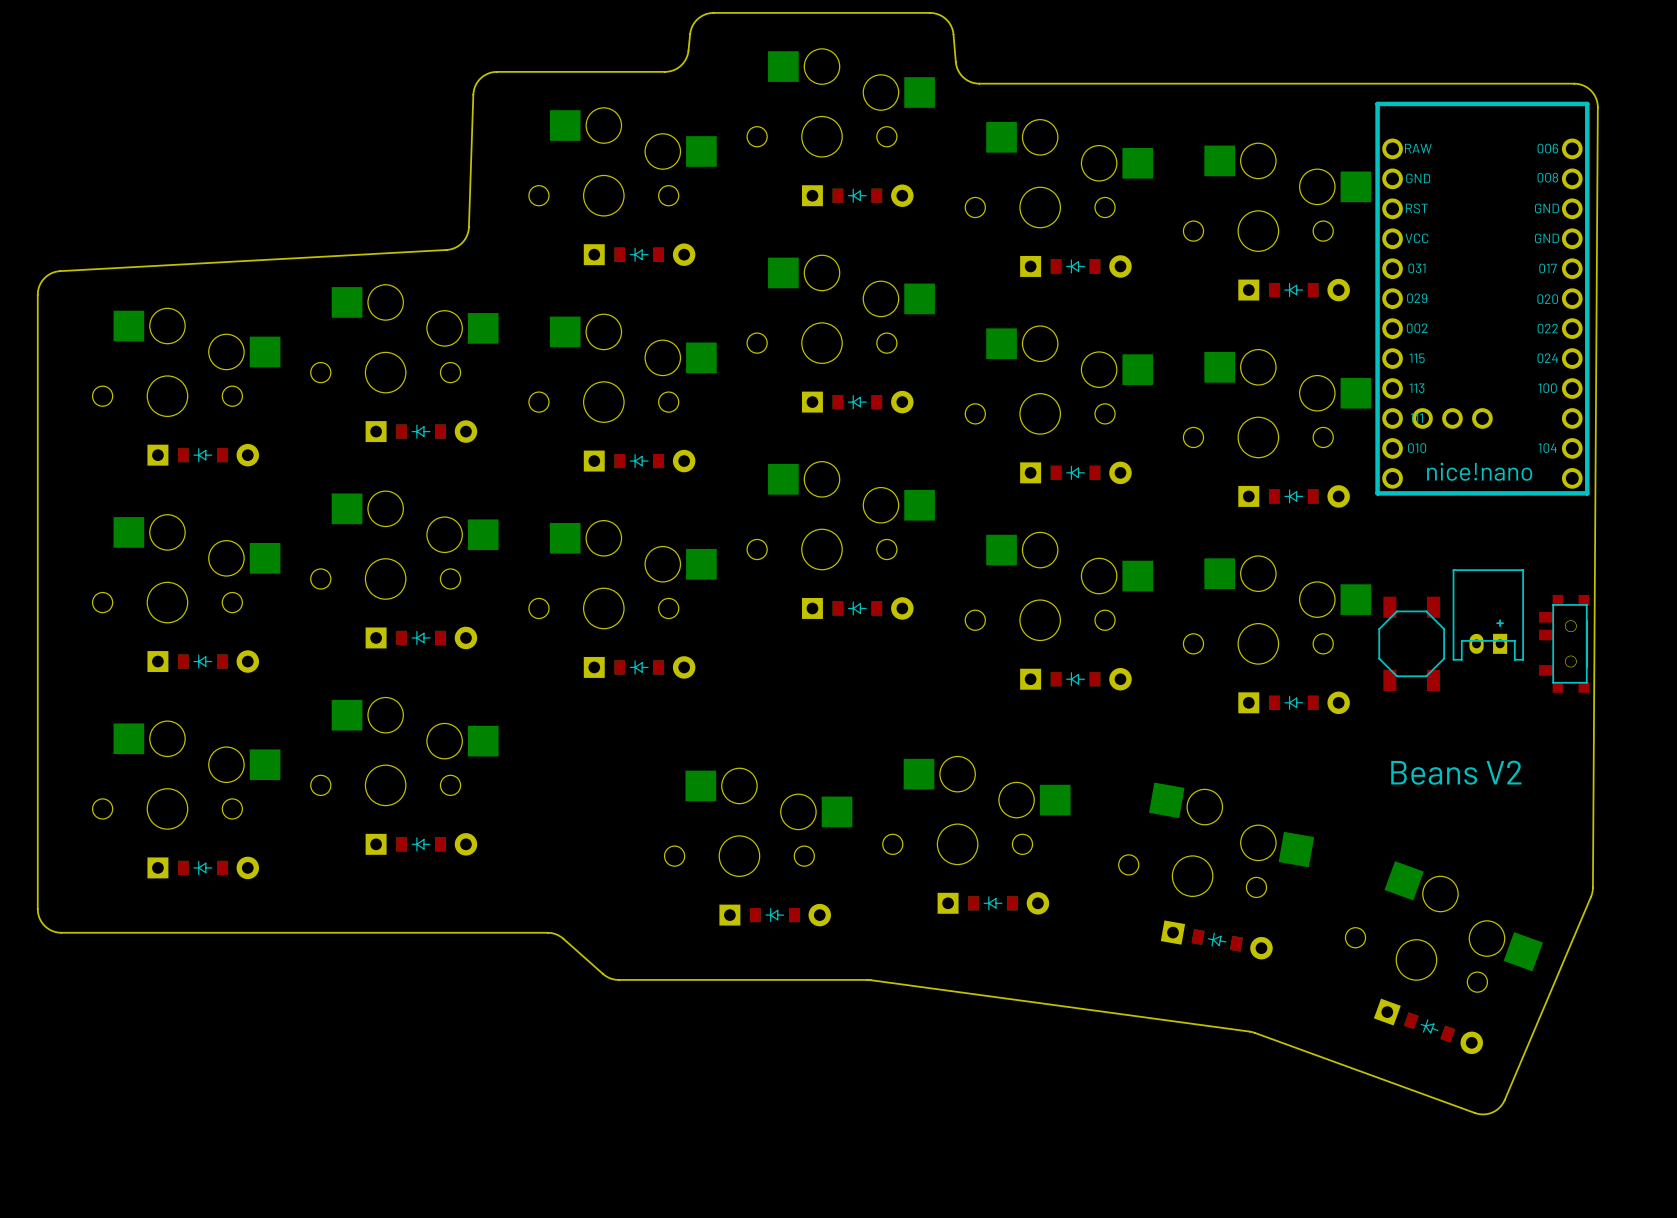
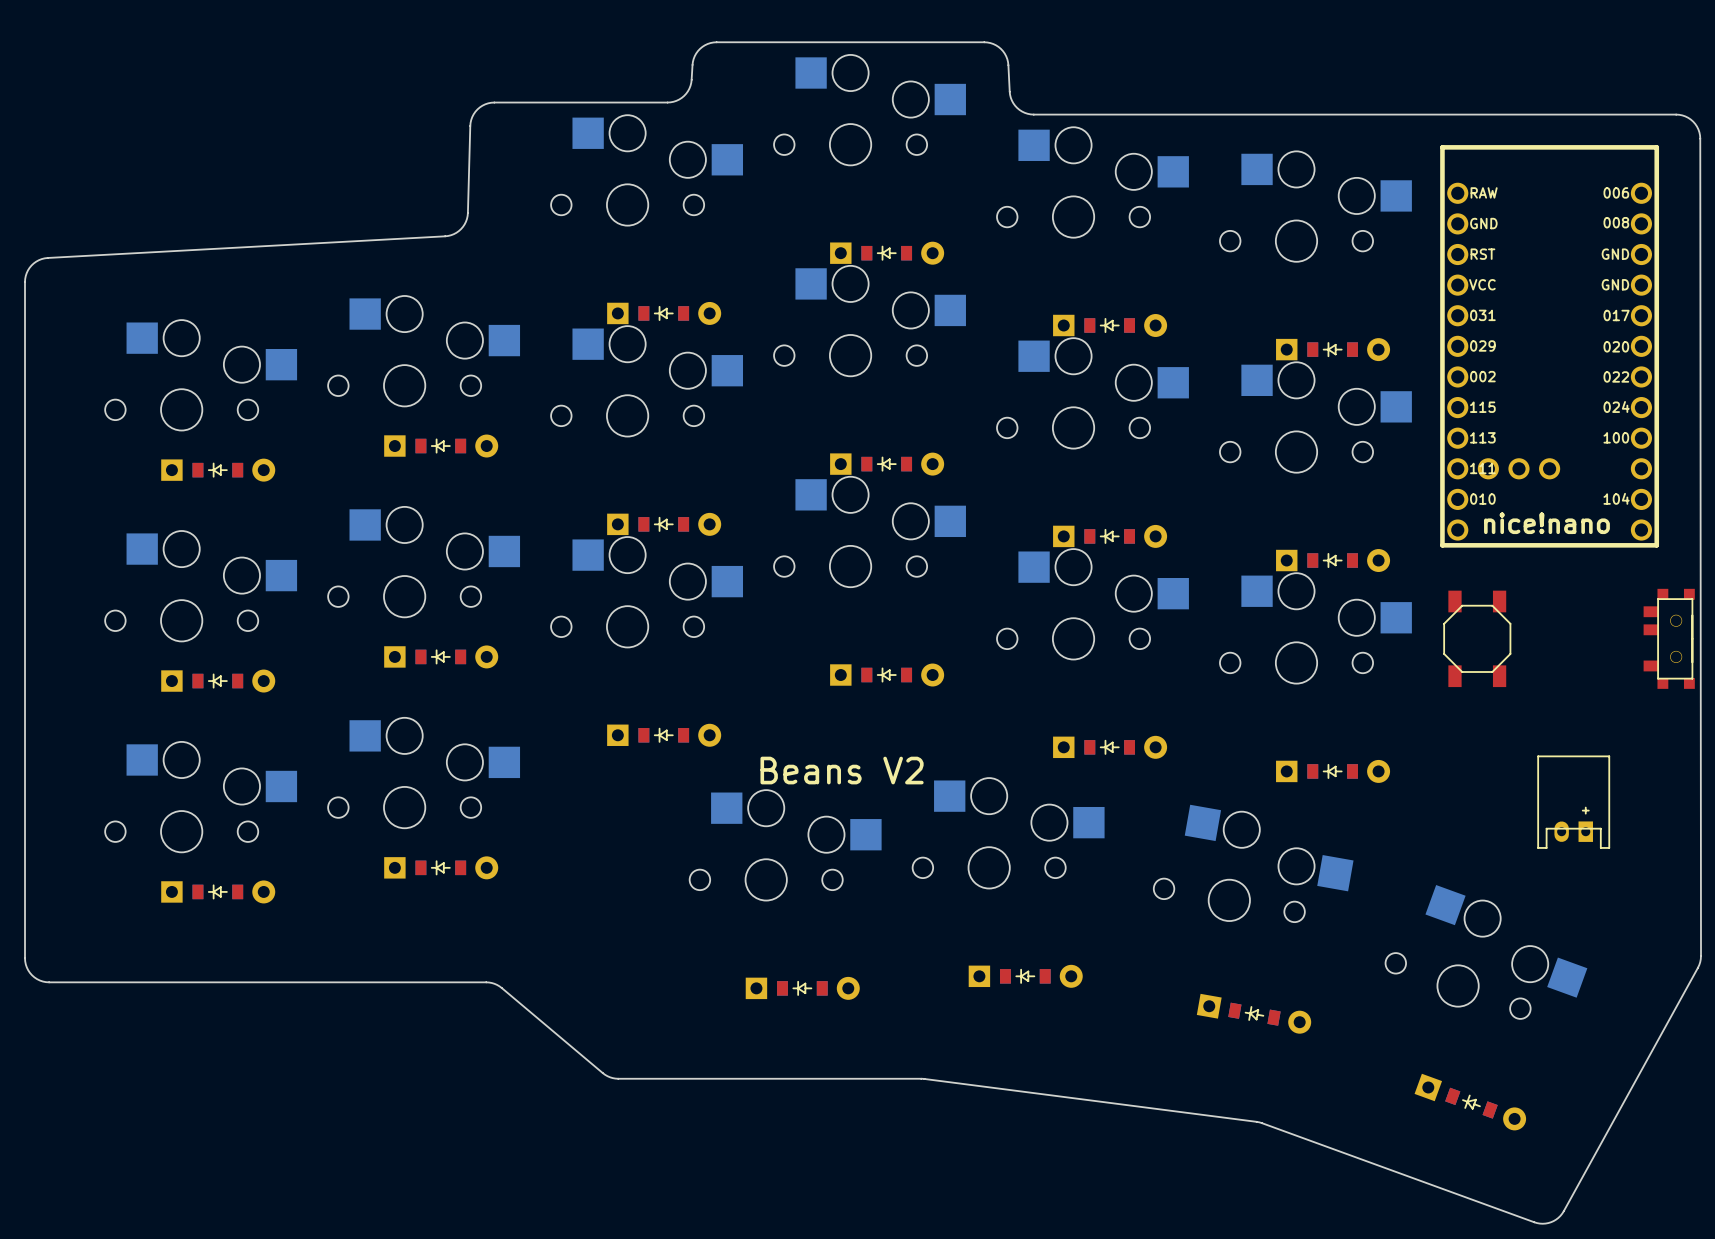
board edge: (713, 12) (935, 13) (945, 19) (952, 28) (956, 64) (959, 72) (968, 80) (976, 83) (1574, 83) (1584, 86) (1592, 92) (1597, 107) (1592, 889) (1504, 1100) (1497, 1109) (1486, 1114) (1474, 1113) (1249, 1031) (869, 980) (613, 979) (603, 973) (561, 936) (550, 932) (61, 932) (49, 929) (42, 923) (37, 909) (37, 294) (42, 280) (51, 273) (60, 271) (446, 249) (455, 247) (464, 240) (468, 230) (473, 94) (475, 85) (480, 78) (488, 73) (496, 71) (670, 71) (680, 65) (686, 58) (690, 31) (694, 23) (702, 15) (713, 12) -> (716, 42) (704, 45) (696, 53) (692, 61) (689, 88) (684, 95) (673, 101) (494, 102) (479, 107) (473, 114) (470, 122) (467, 218) (461, 229) (451, 235) (47, 257) (36, 261) (29, 267) (25, 282) (25, 958) (29, 972) (37, 979) (49, 982) (489, 982) (501, 988) (602, 1073) (612, 1078) (922, 1078) (1256, 1121) (1534, 1222) (1545, 1223) (1556, 1219) (1563, 1211) (1698, 967) (1700, 959) (1700, 138) (1695, 124) (1685, 116) (1676, 114) (1030, 114) (1022, 111) (1013, 103) (1010, 94) (1007, 59) (1000, 48) (990, 43) (716, 42)
part position: (857, 195) -> (887, 253)
part position: (639, 254) -> (664, 313)
part position: (1075, 266) -> (1110, 325)
part position: (1294, 290) -> (1333, 349)
part position: (1482, 298) -> (1549, 346)
part position: (857, 402) -> (887, 464)
part position: (639, 461) -> (664, 524)
part position: (1075, 472) -> (1110, 536)
part position: (1294, 496) -> (1333, 560)
part position: (857, 608) -> (887, 675)
part position: (1488, 614) -> (1573, 802)
part position: (1411, 643) -> (1477, 638)
part position: (1564, 643) -> (1669, 638)
part position: (639, 667) -> (664, 735)
part position: (1075, 679) -> (1110, 747)
part position: (1294, 702) -> (1333, 771)
text: none -> Beans V2 (842, 770)
text: Beans V2 (1456, 772) -> none
part position: (993, 903) -> (1025, 976)
part position: (775, 915) -> (802, 988)
part position: (1216, 939) -> (1254, 1013)
part position: (1428, 1026) -> (1470, 1102)

